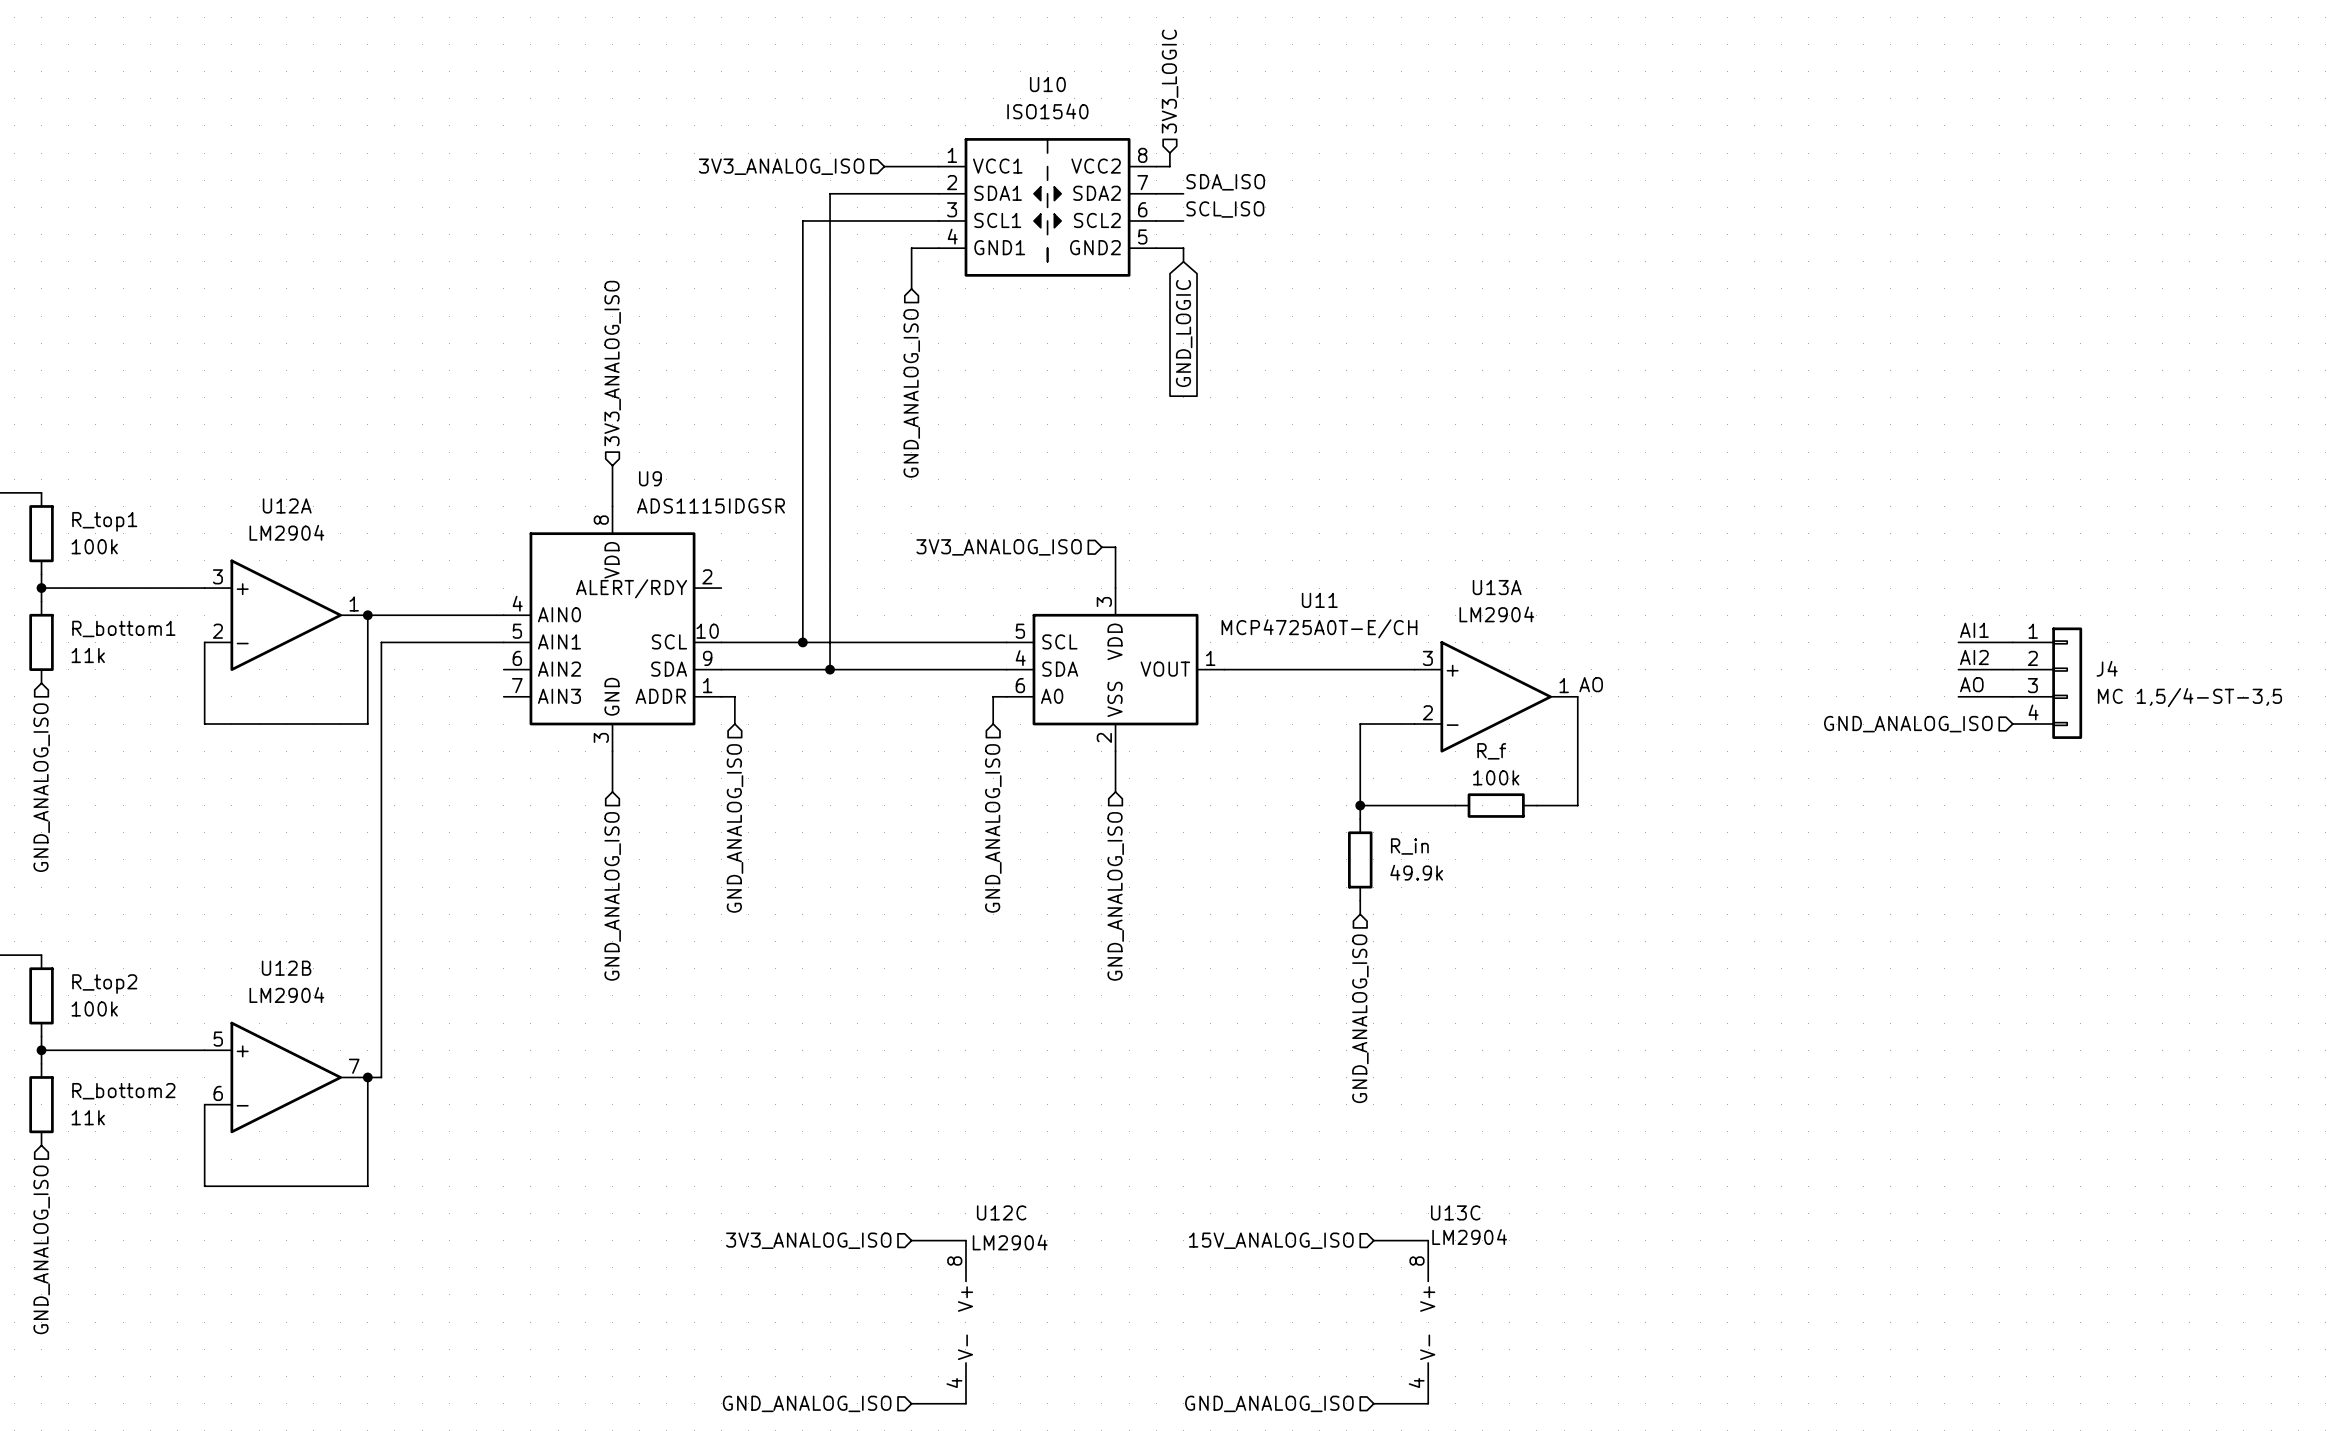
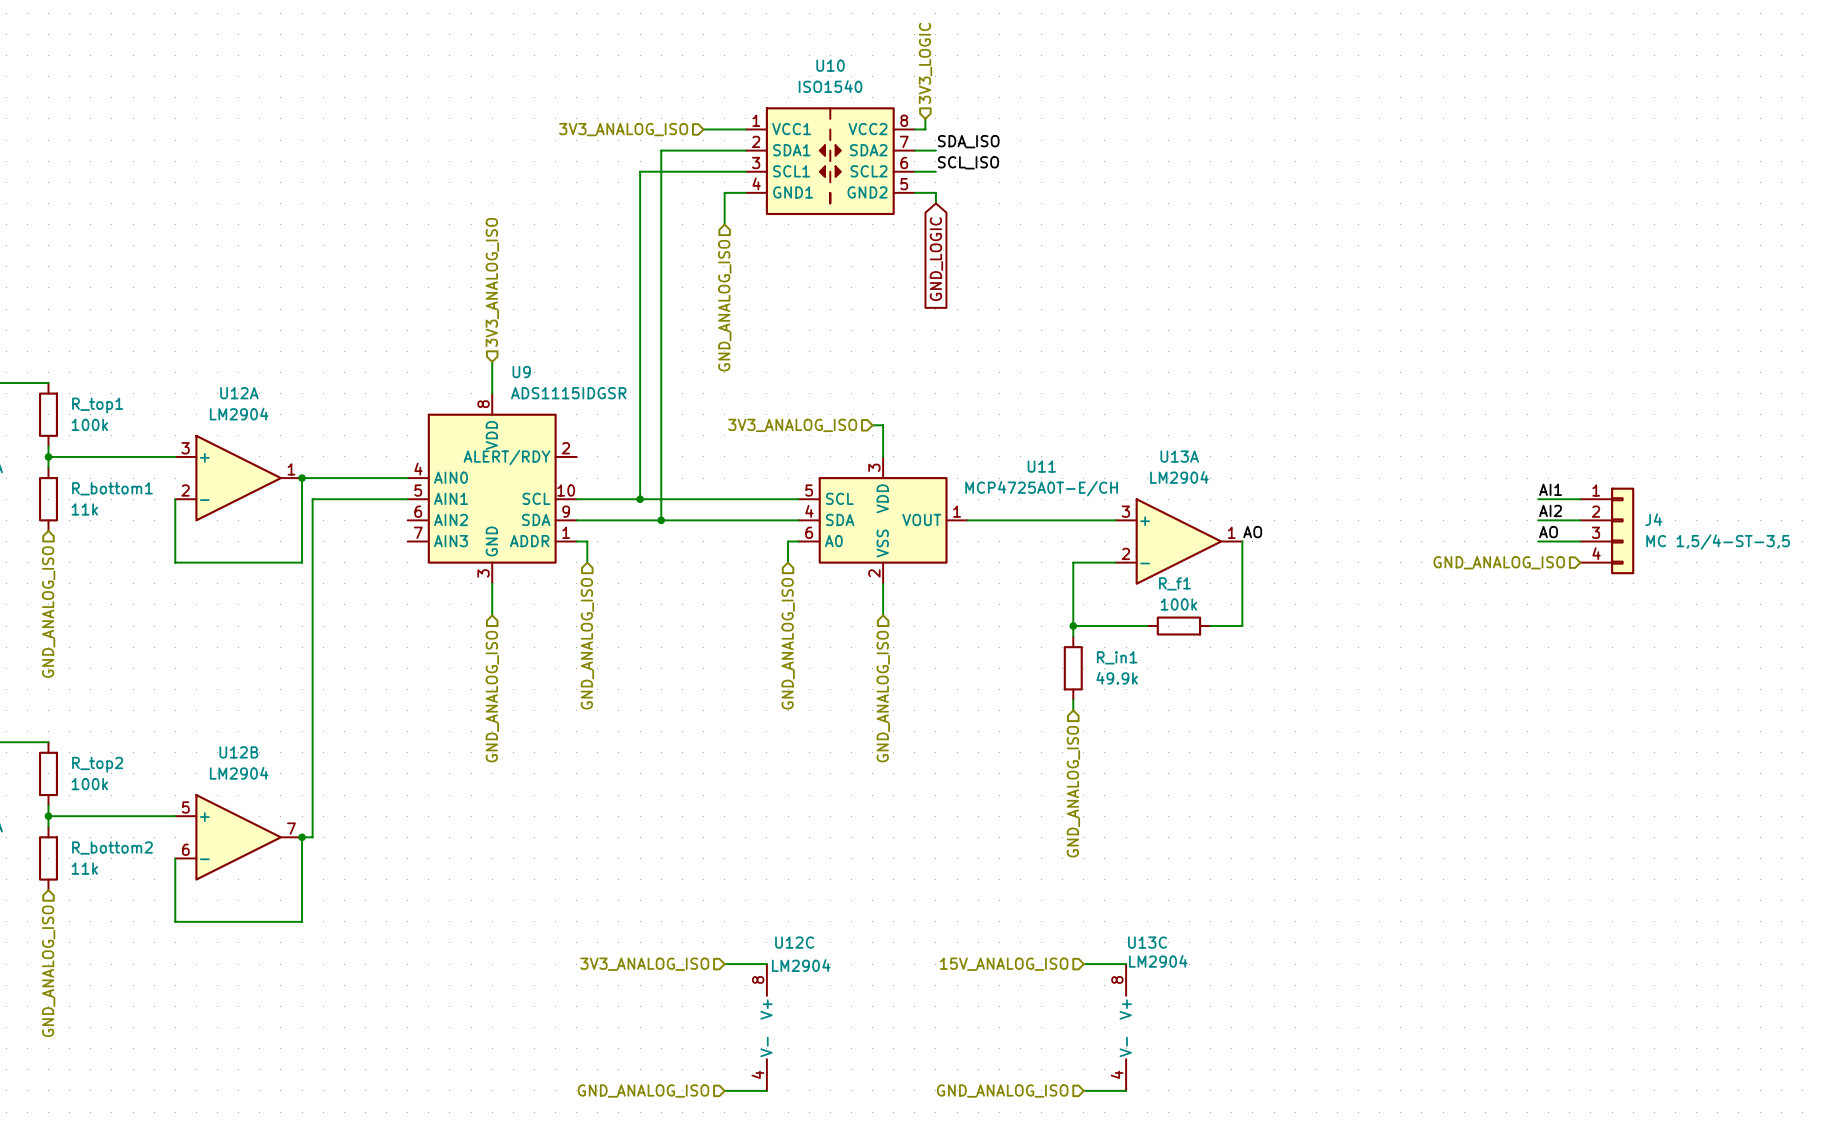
R_f name: R_f (1491, 751) -> R_f1 (1174, 583)
R_in name: R_in (1409, 846) -> R_in1 (1117, 657)

